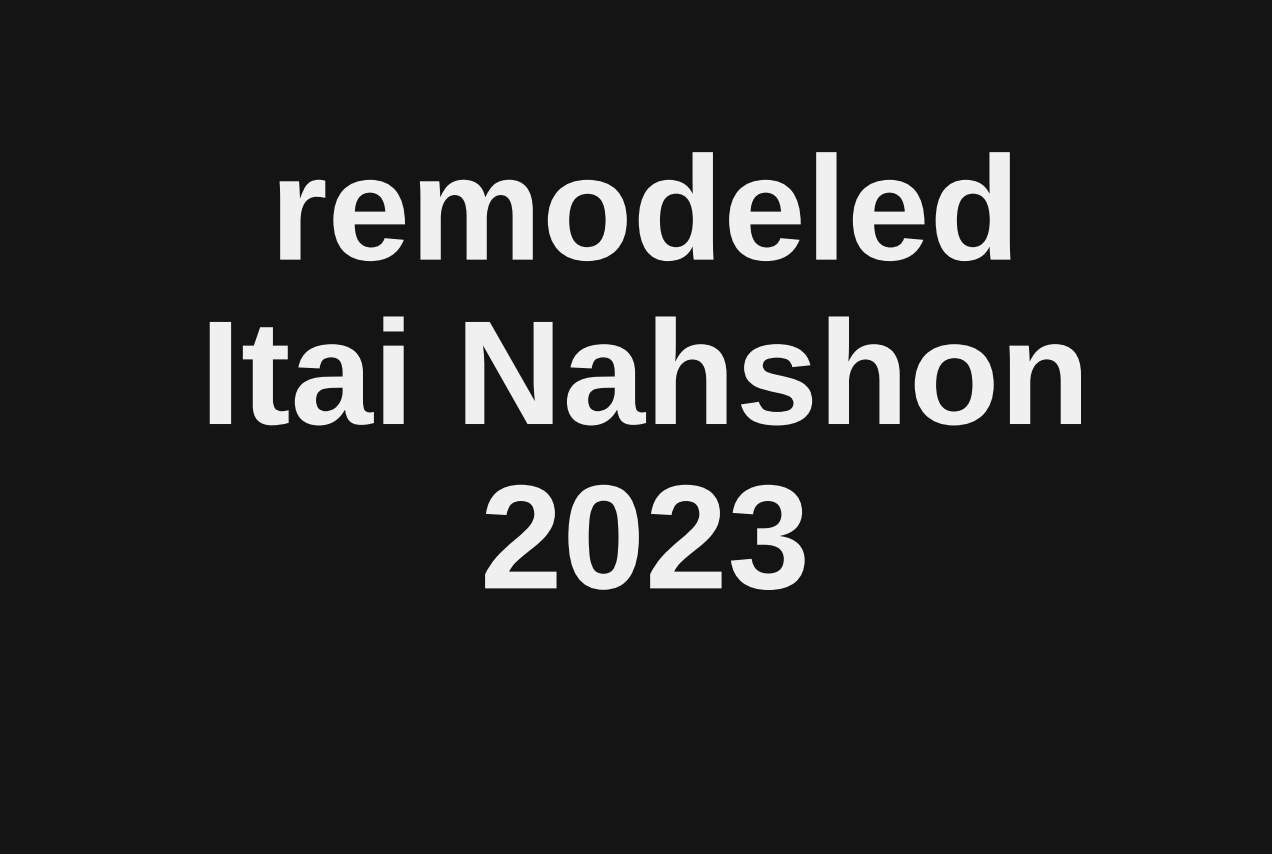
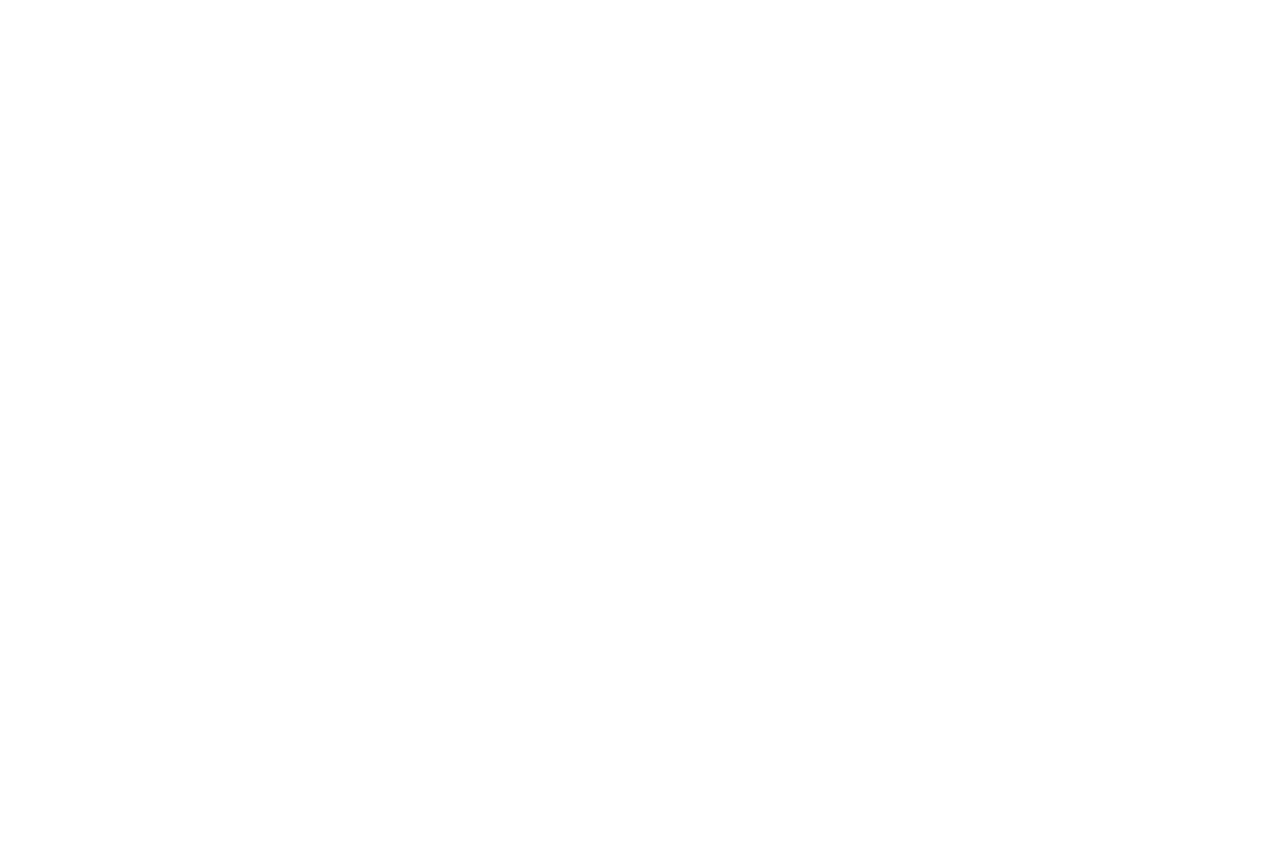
text: remodeled (645, 206) -> none
text: Itai Nahshon (645, 370) -> none
text: 2023 (644, 537) -> none

